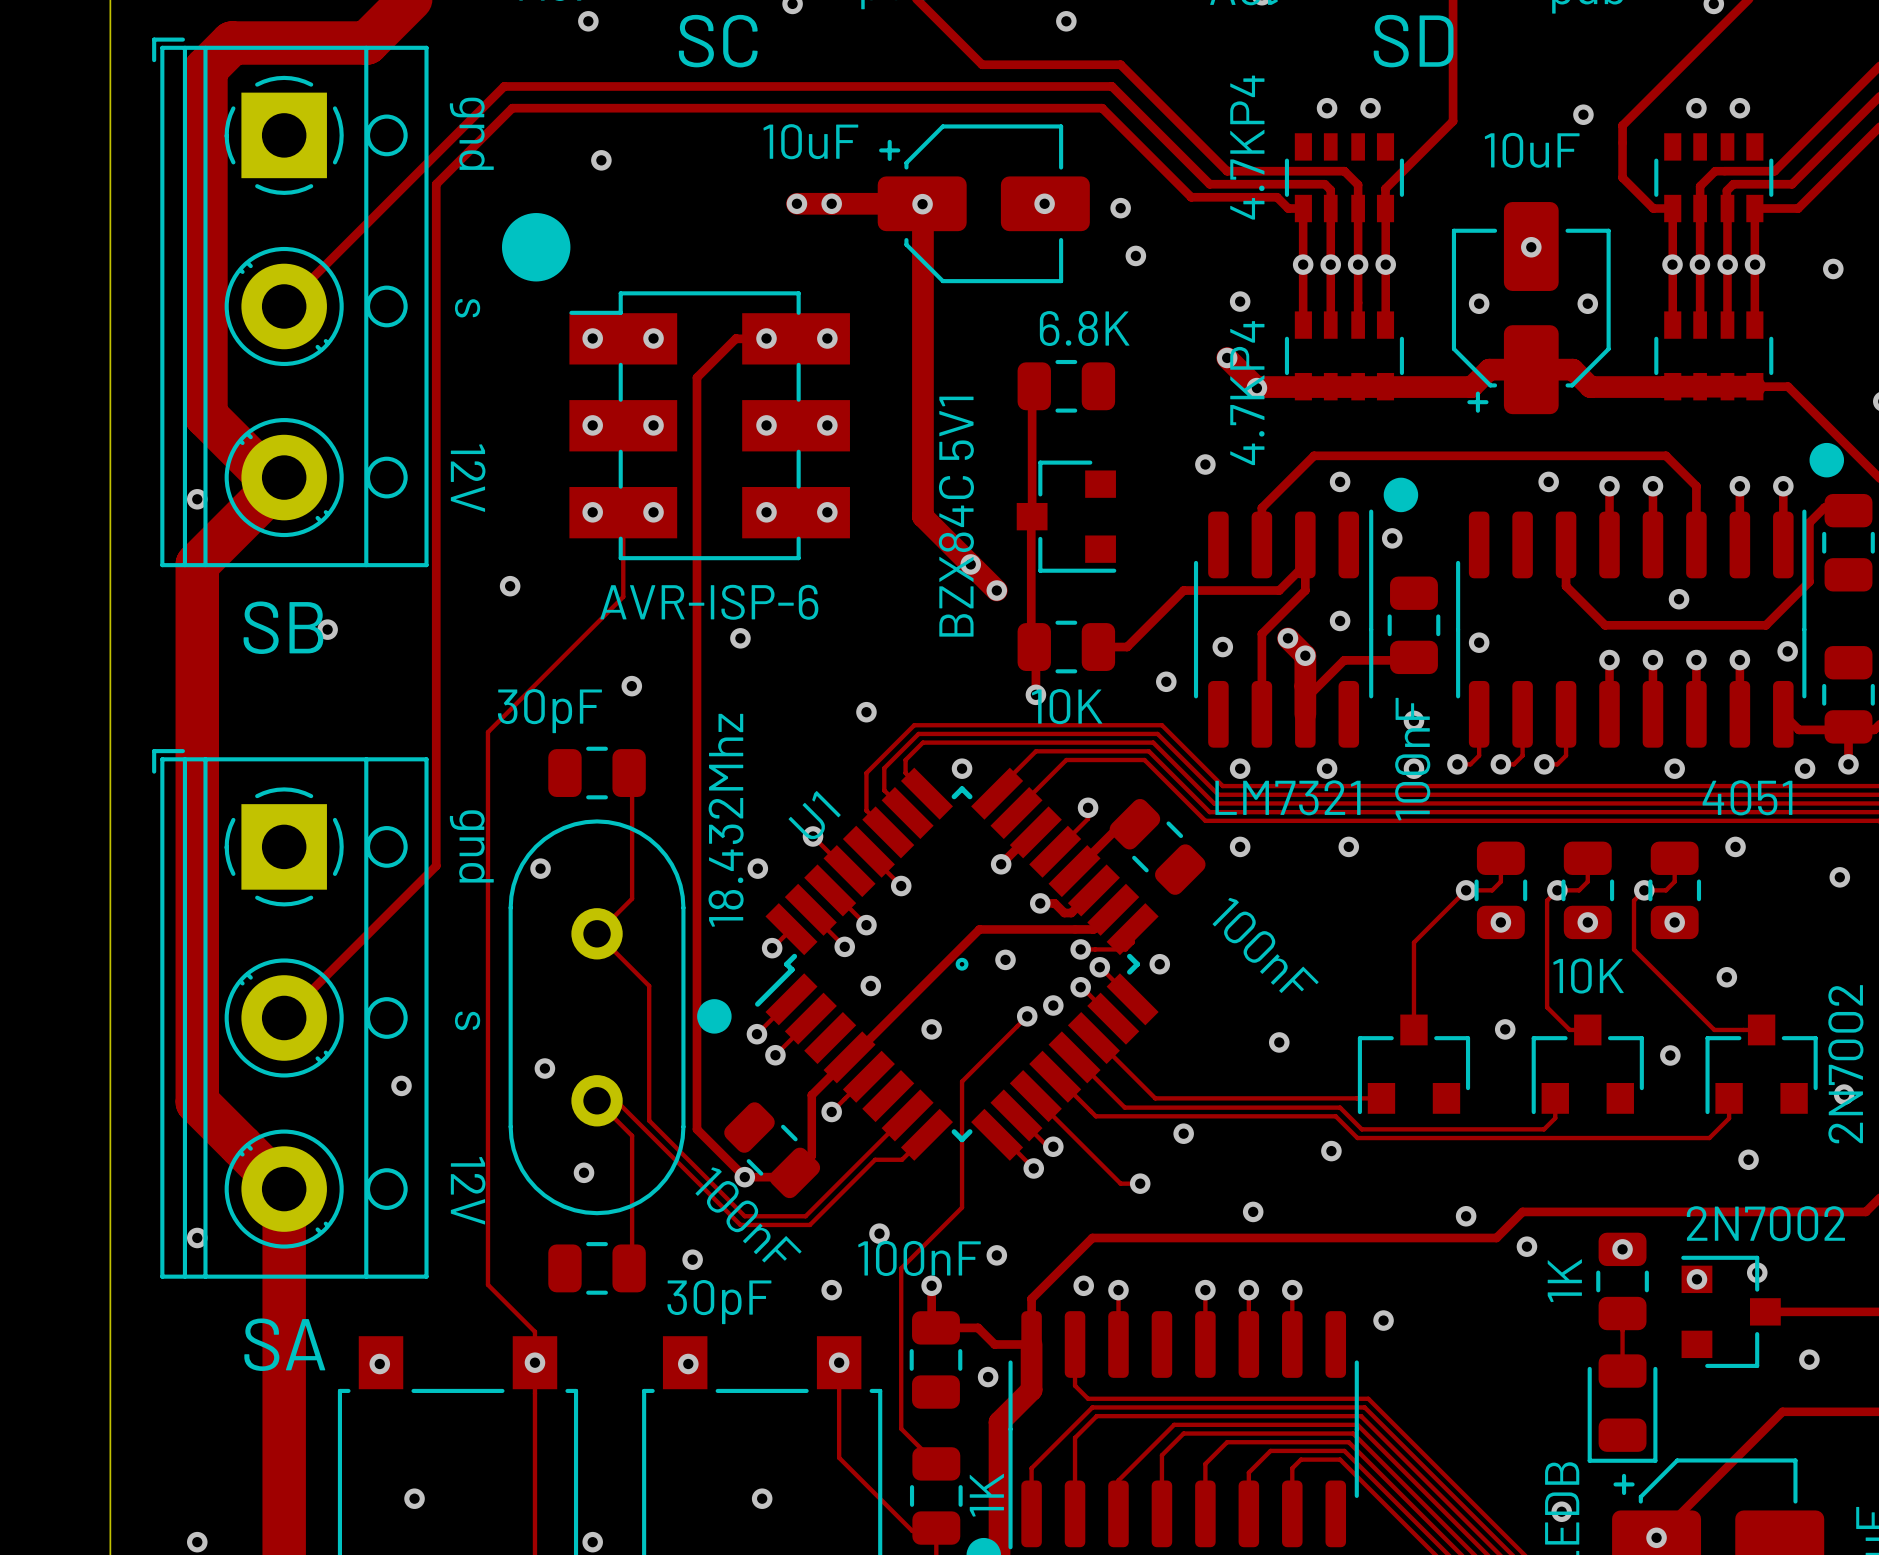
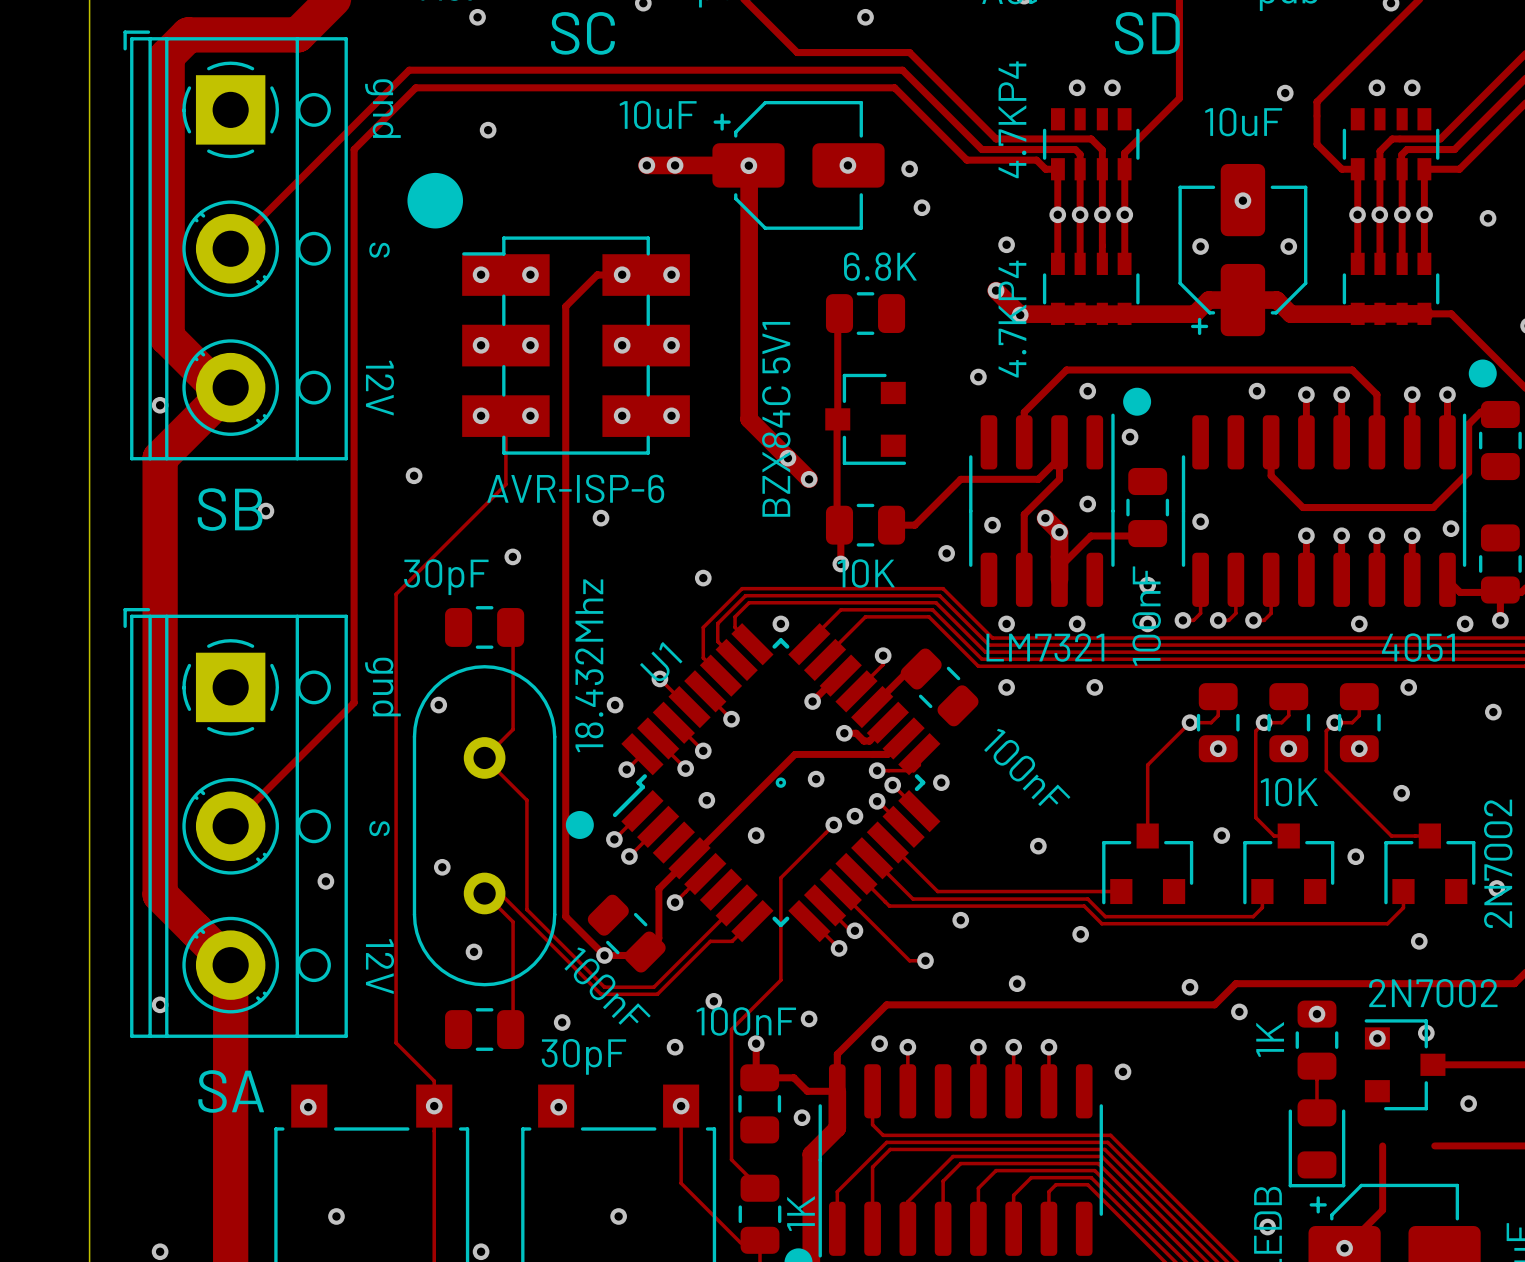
via: (1679, 599) -> none
track: none -> (1434, 1145) (1446, 1145)
track: (1782, 1411) (1703, 1490) -> (1382, 1145) (1382, 1210)

